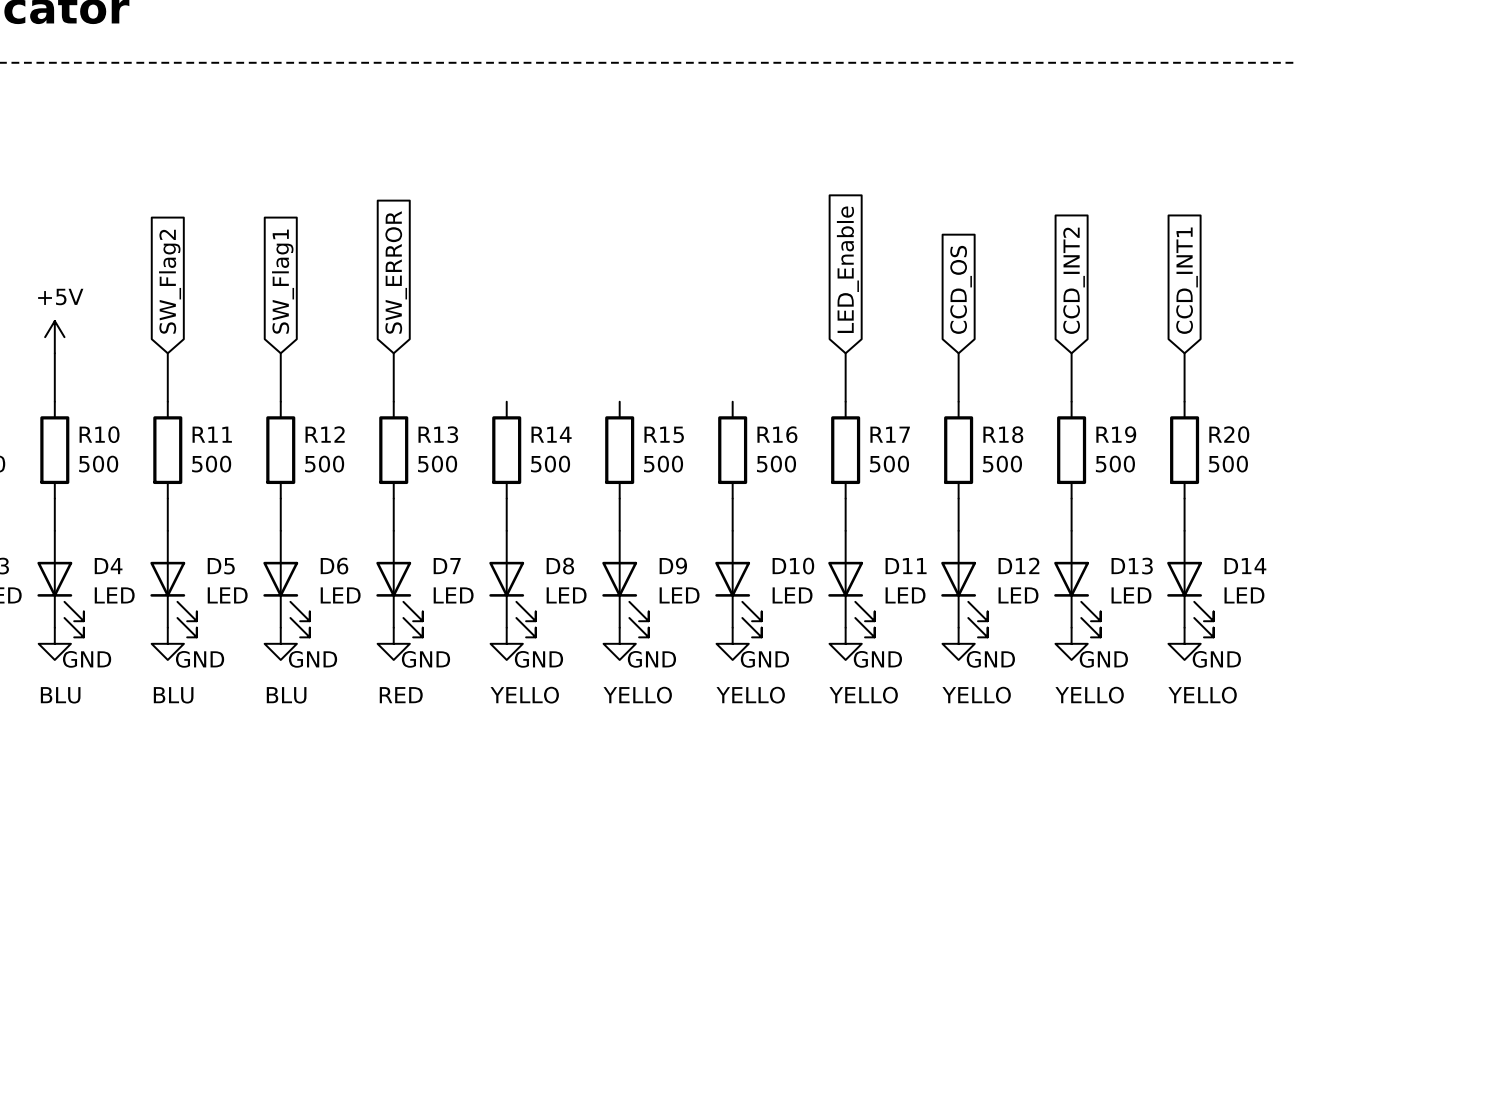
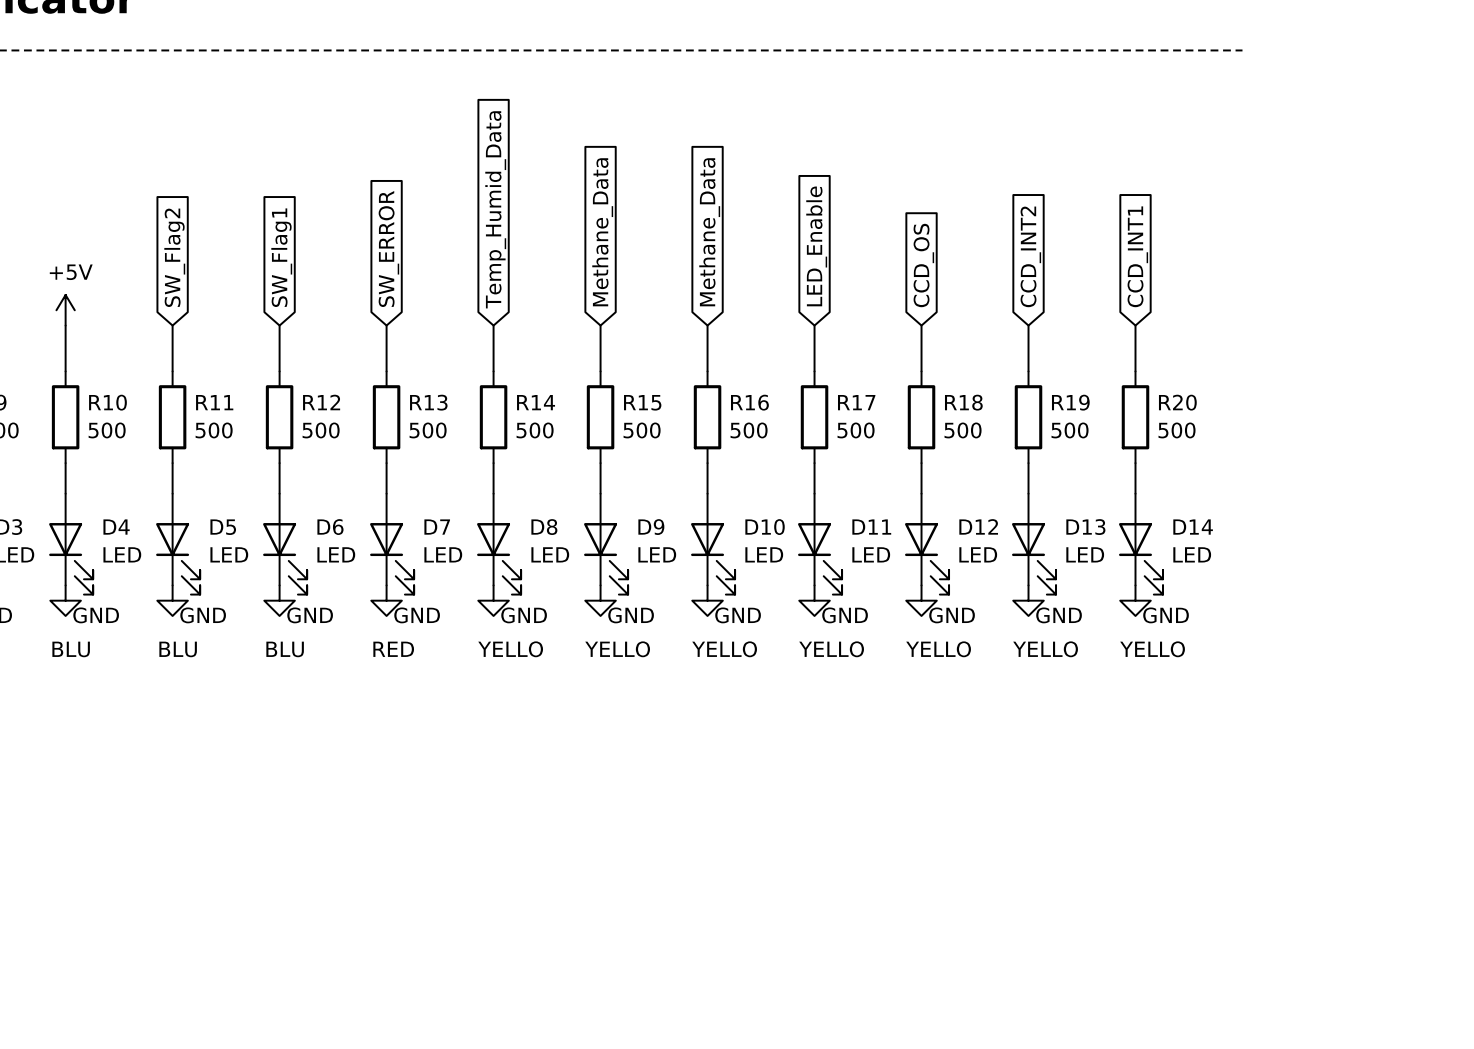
global label: none -> Temp_Humid_Data (495, 209)
global label: none -> Methane_Data (602, 232)
global label: none -> Methane_Data (709, 232)
wire: none -> (493, 325) (493, 371)
wire: none -> (600, 325) (600, 371)
wire: none -> (707, 325) (707, 371)

